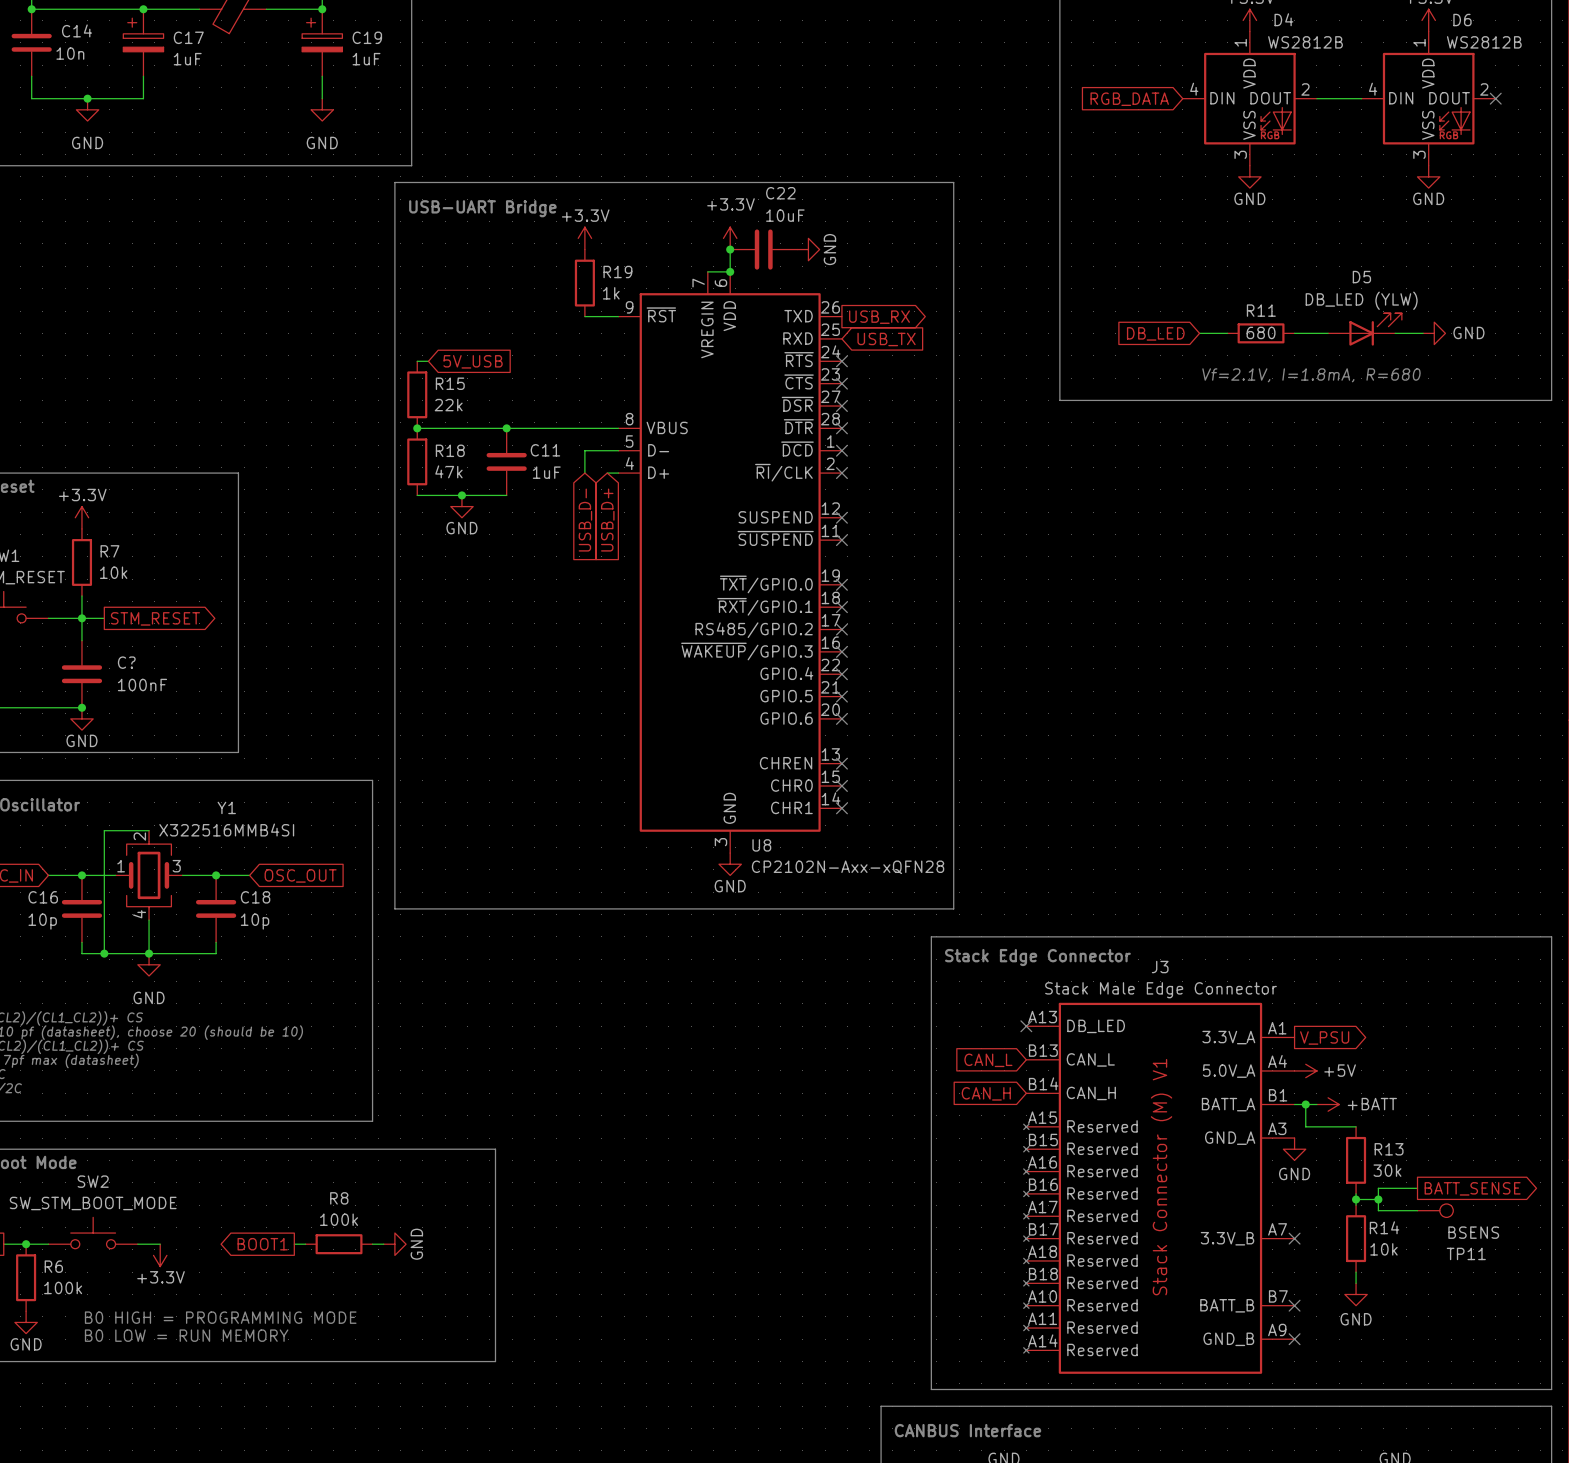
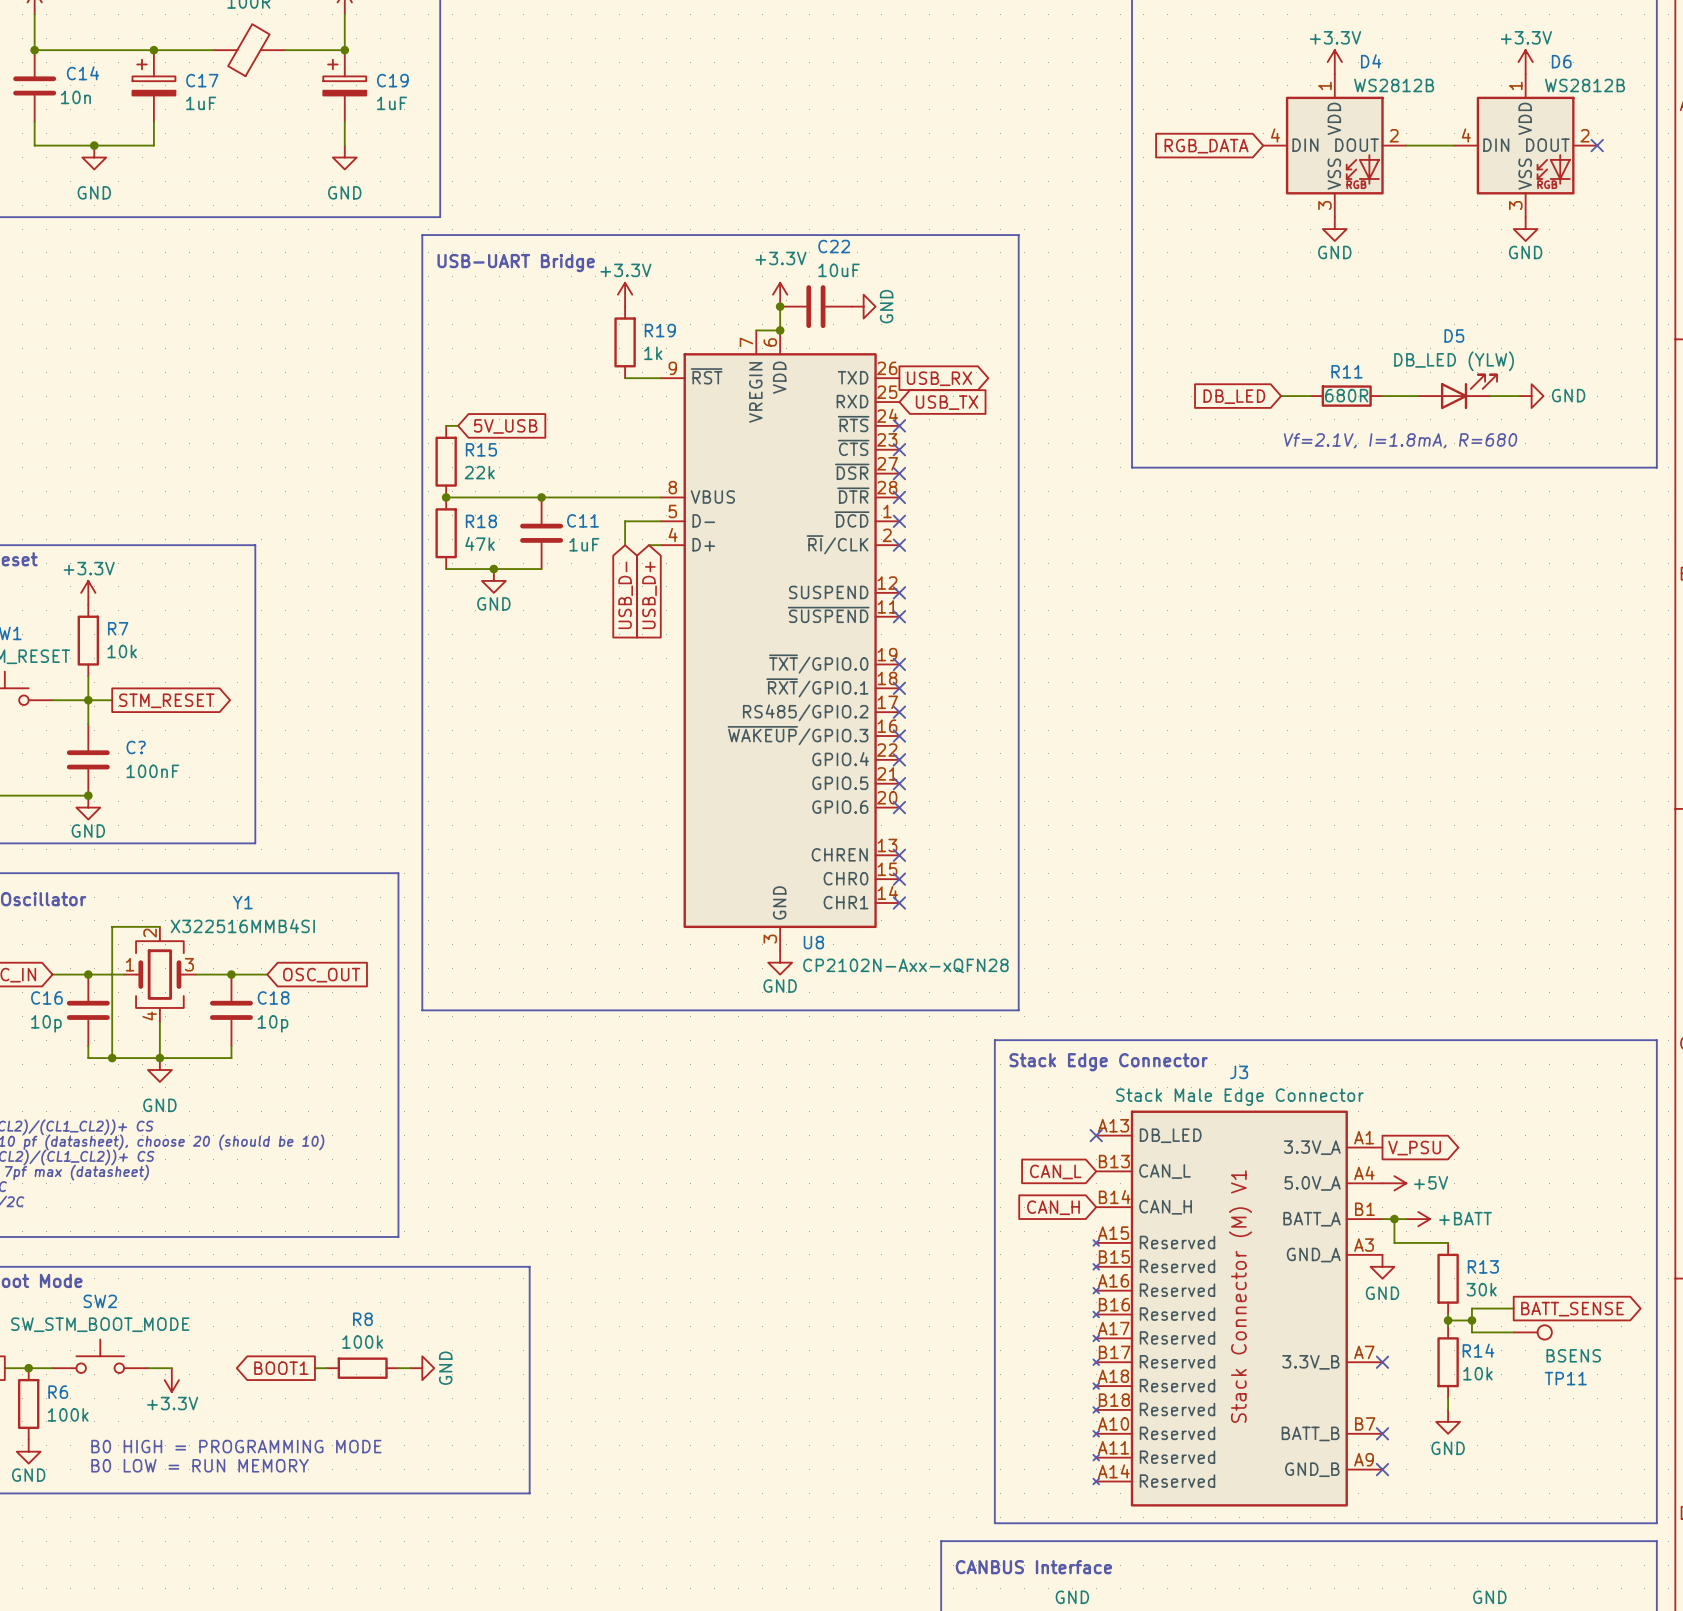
R11 value: 680 (1261, 332) -> 680R (1346, 395)

